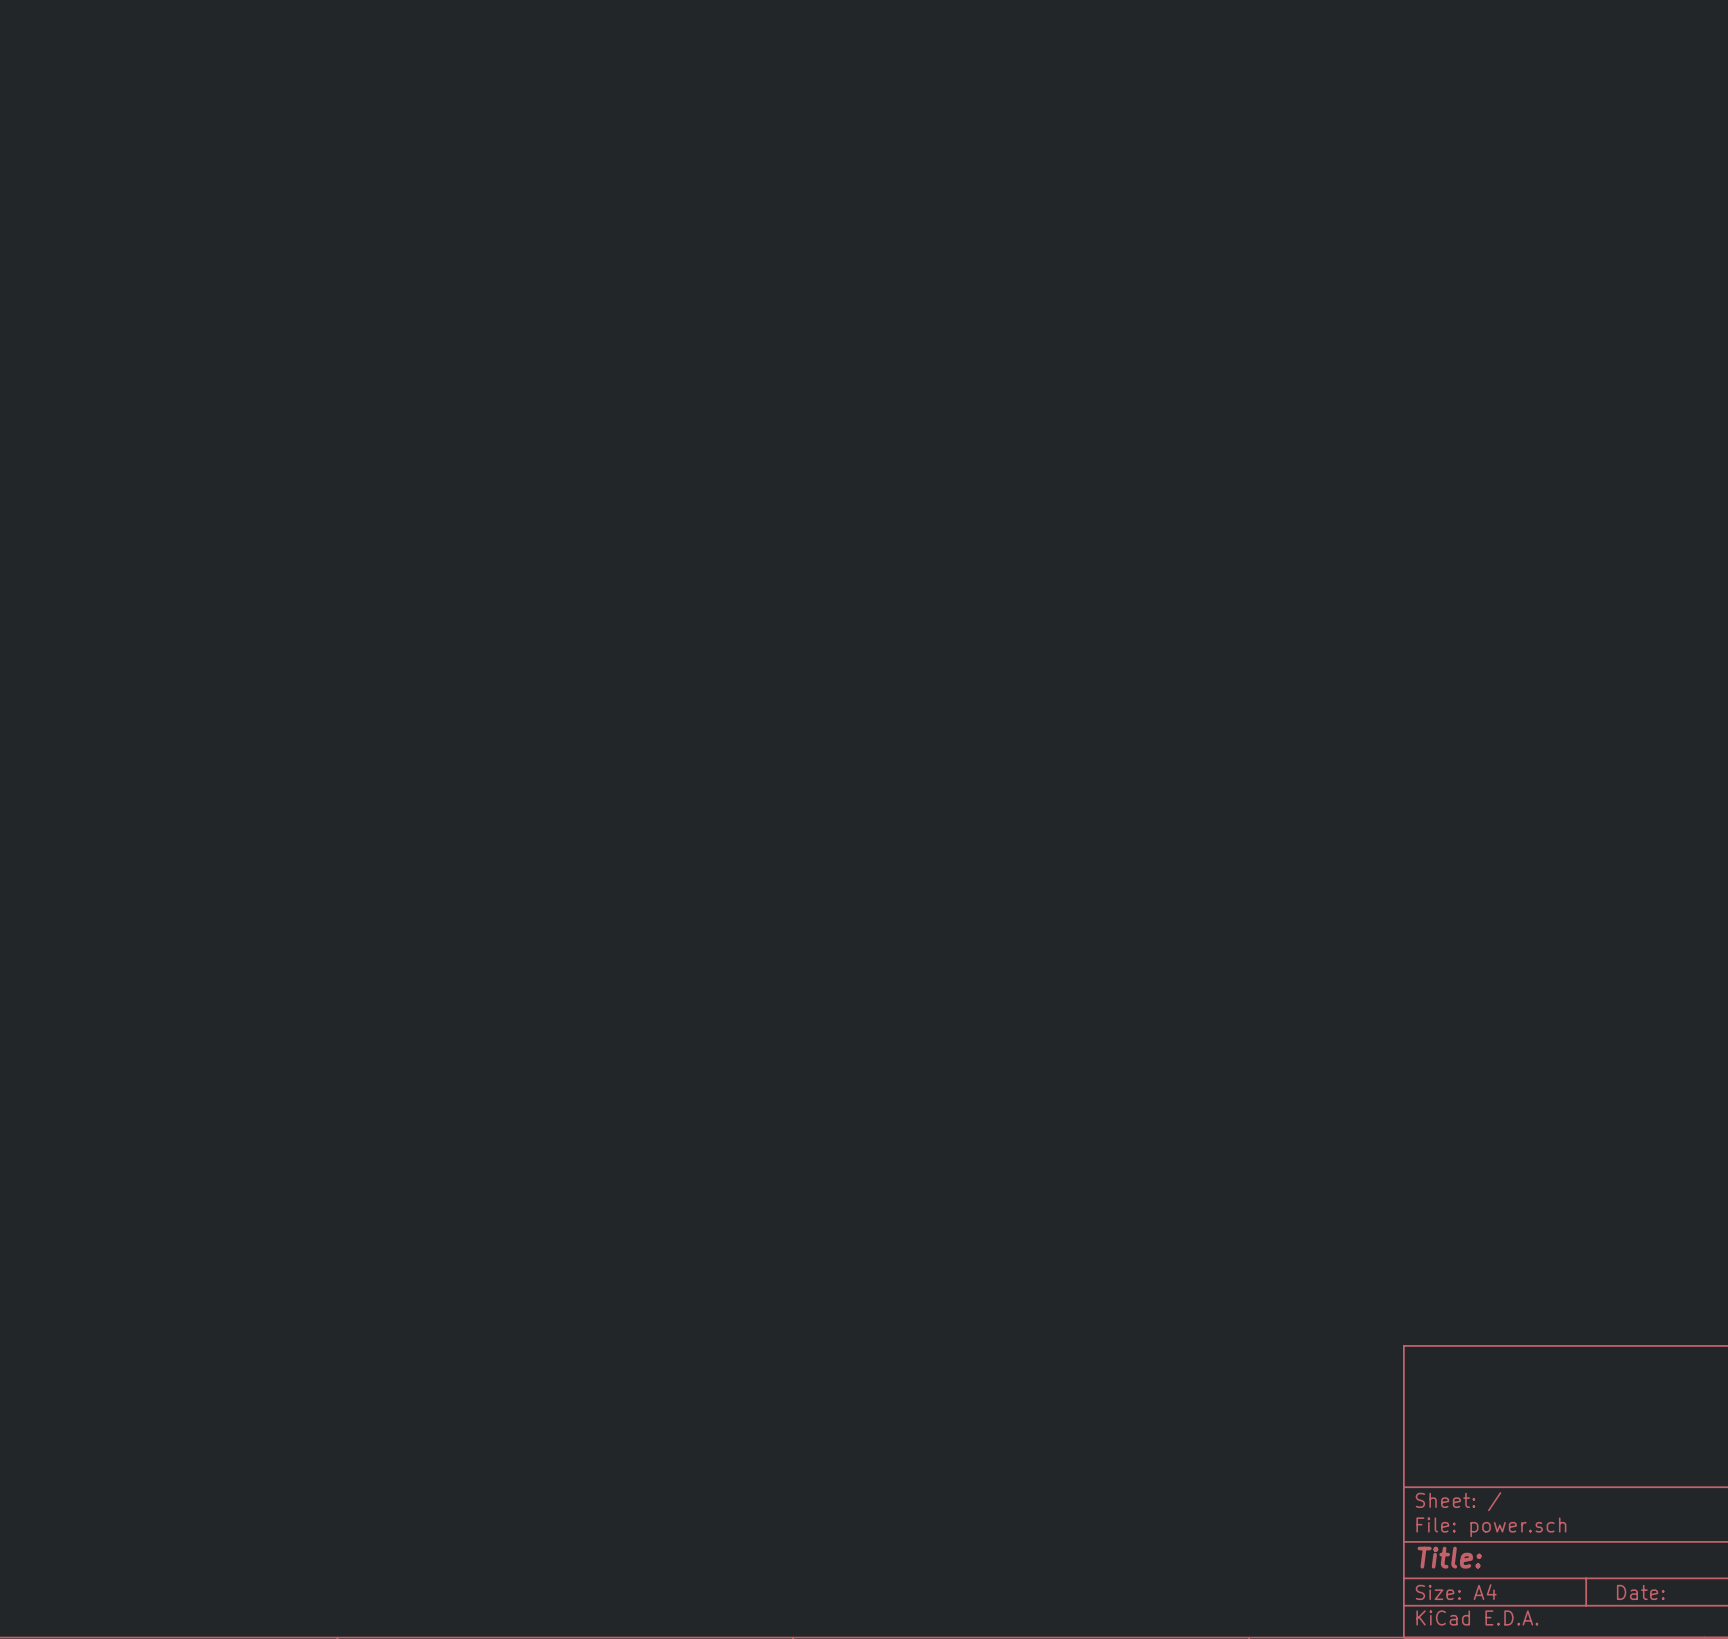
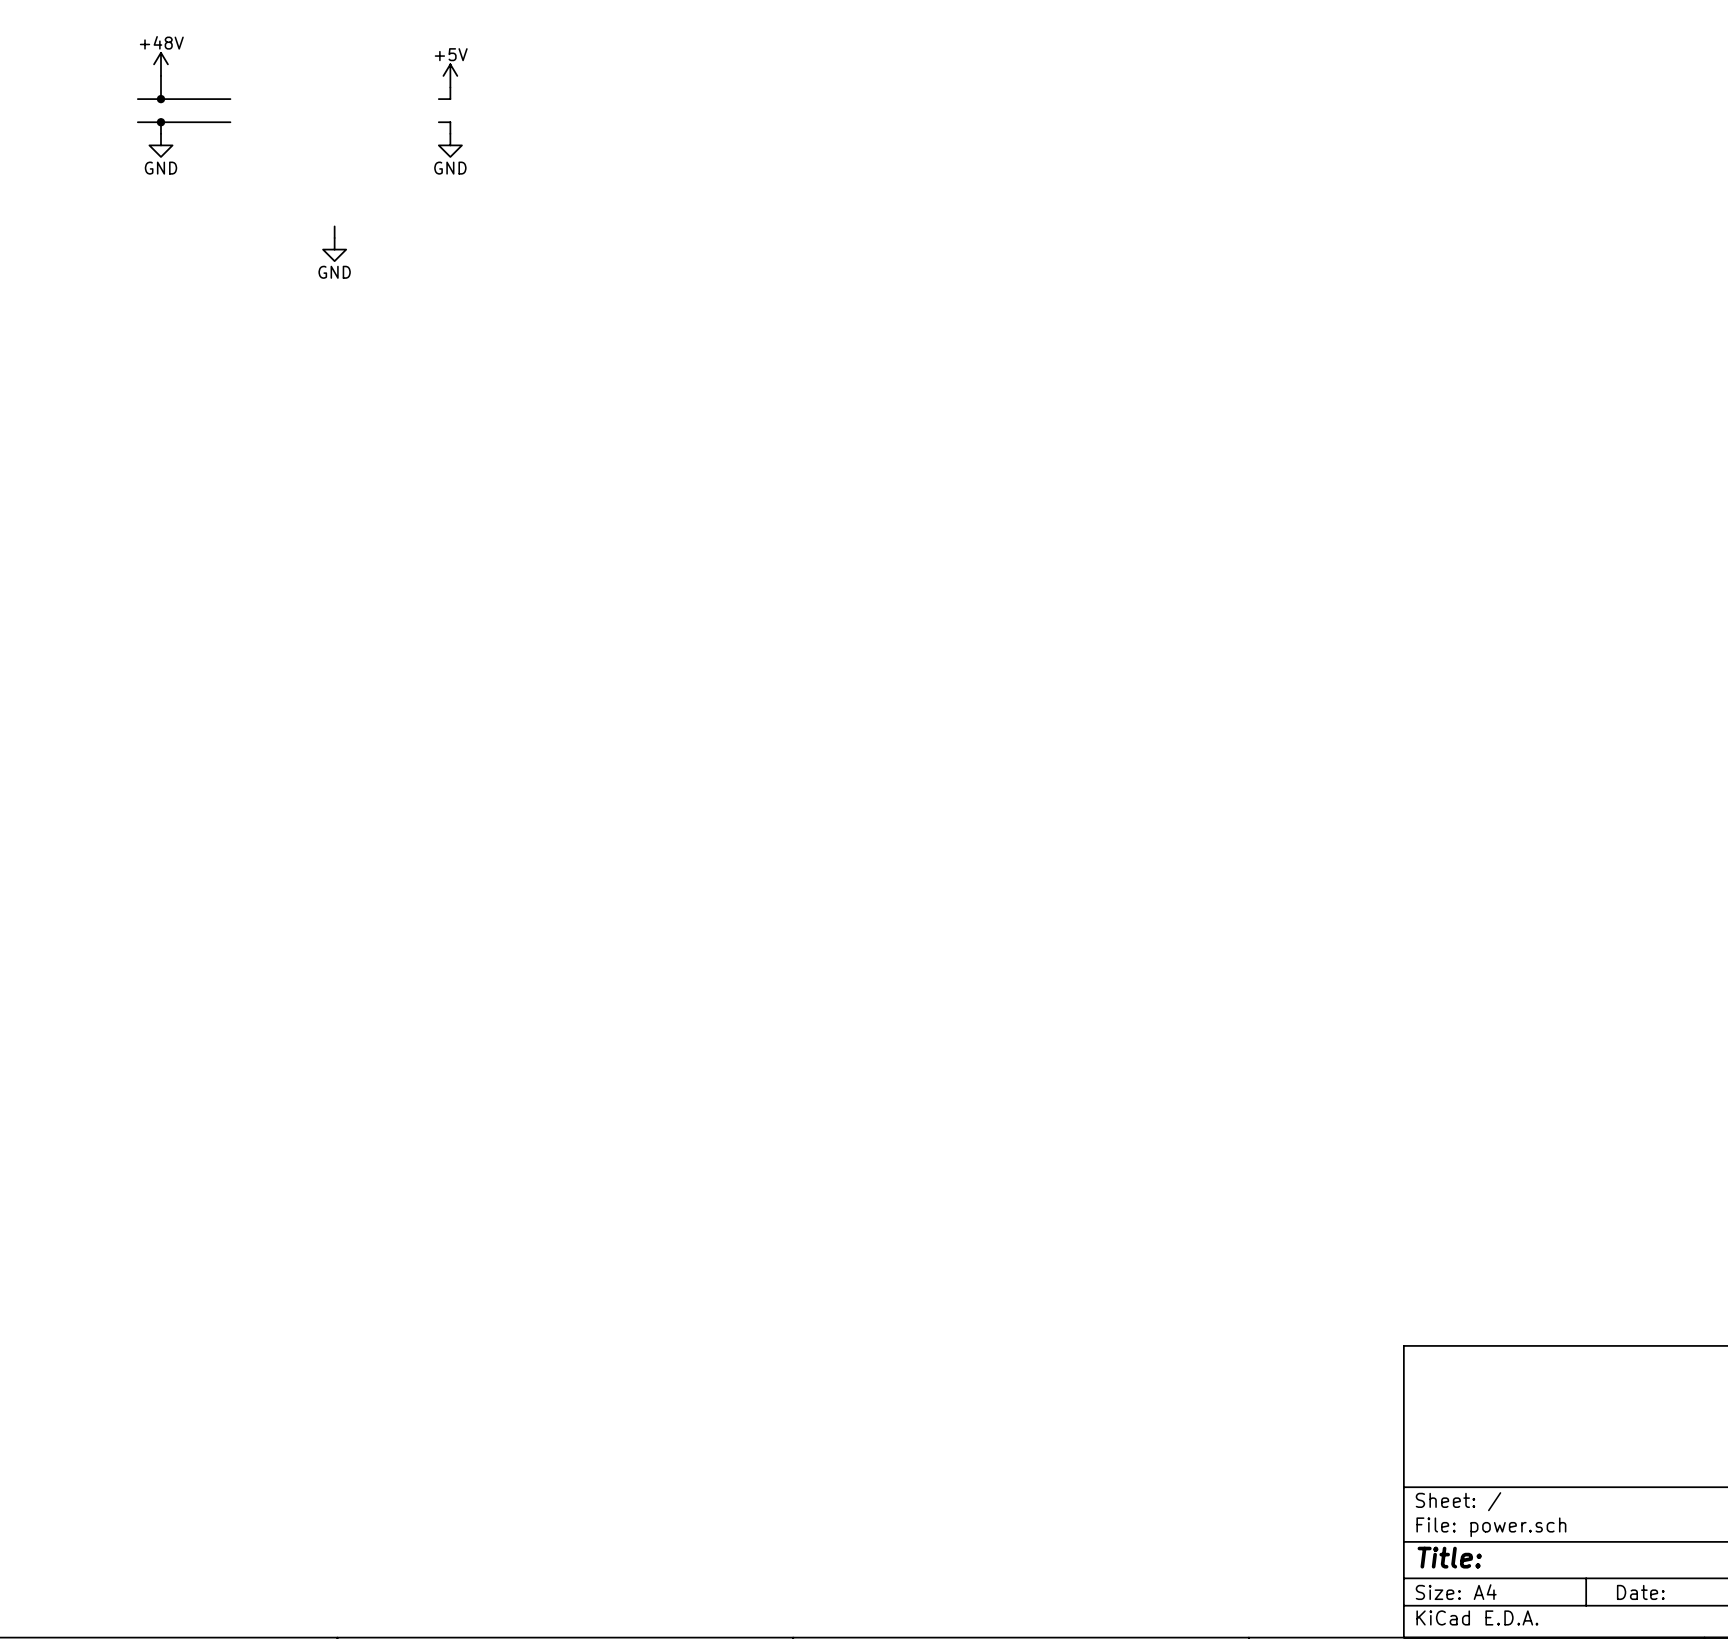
power symbol: none -> +48V (160, 64)
wire: none -> (160, 75) (160, 99)
power symbol: none -> +5V (450, 75)
wire: none -> (450, 87) (450, 99) (438, 99)
wire: none -> (137, 99) (230, 99)
junction: none -> (160, 99)
wire: none -> (137, 122) (230, 122)
wire: none -> (160, 122) (160, 133)
junction: none -> (160, 122)
wire: none -> (438, 122) (450, 122) (450, 133)
power symbol: none -> GND (160, 145)
power symbol: none -> GND (450, 145)
wire: none -> (334, 226) (334, 237)
power symbol: none -> GND (334, 249)

